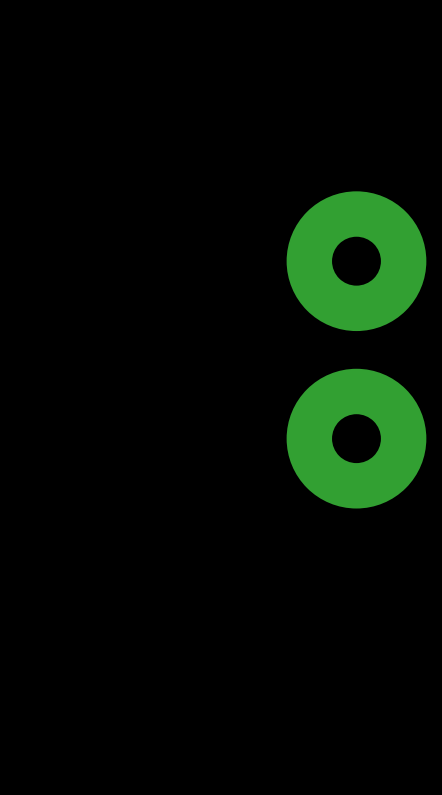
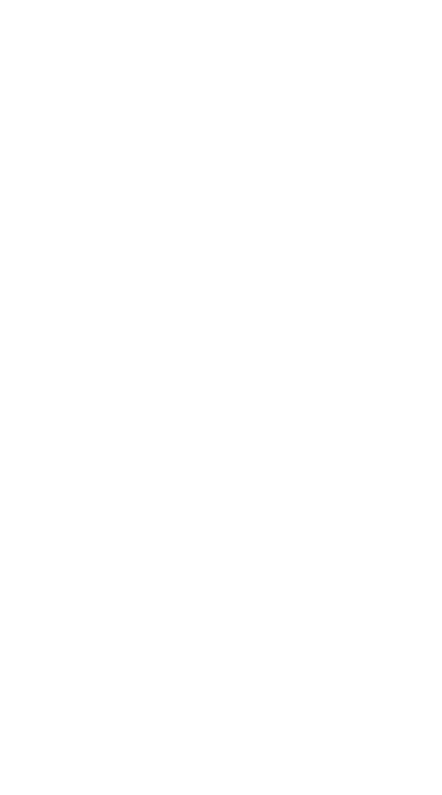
part: (356, 349) -> none

